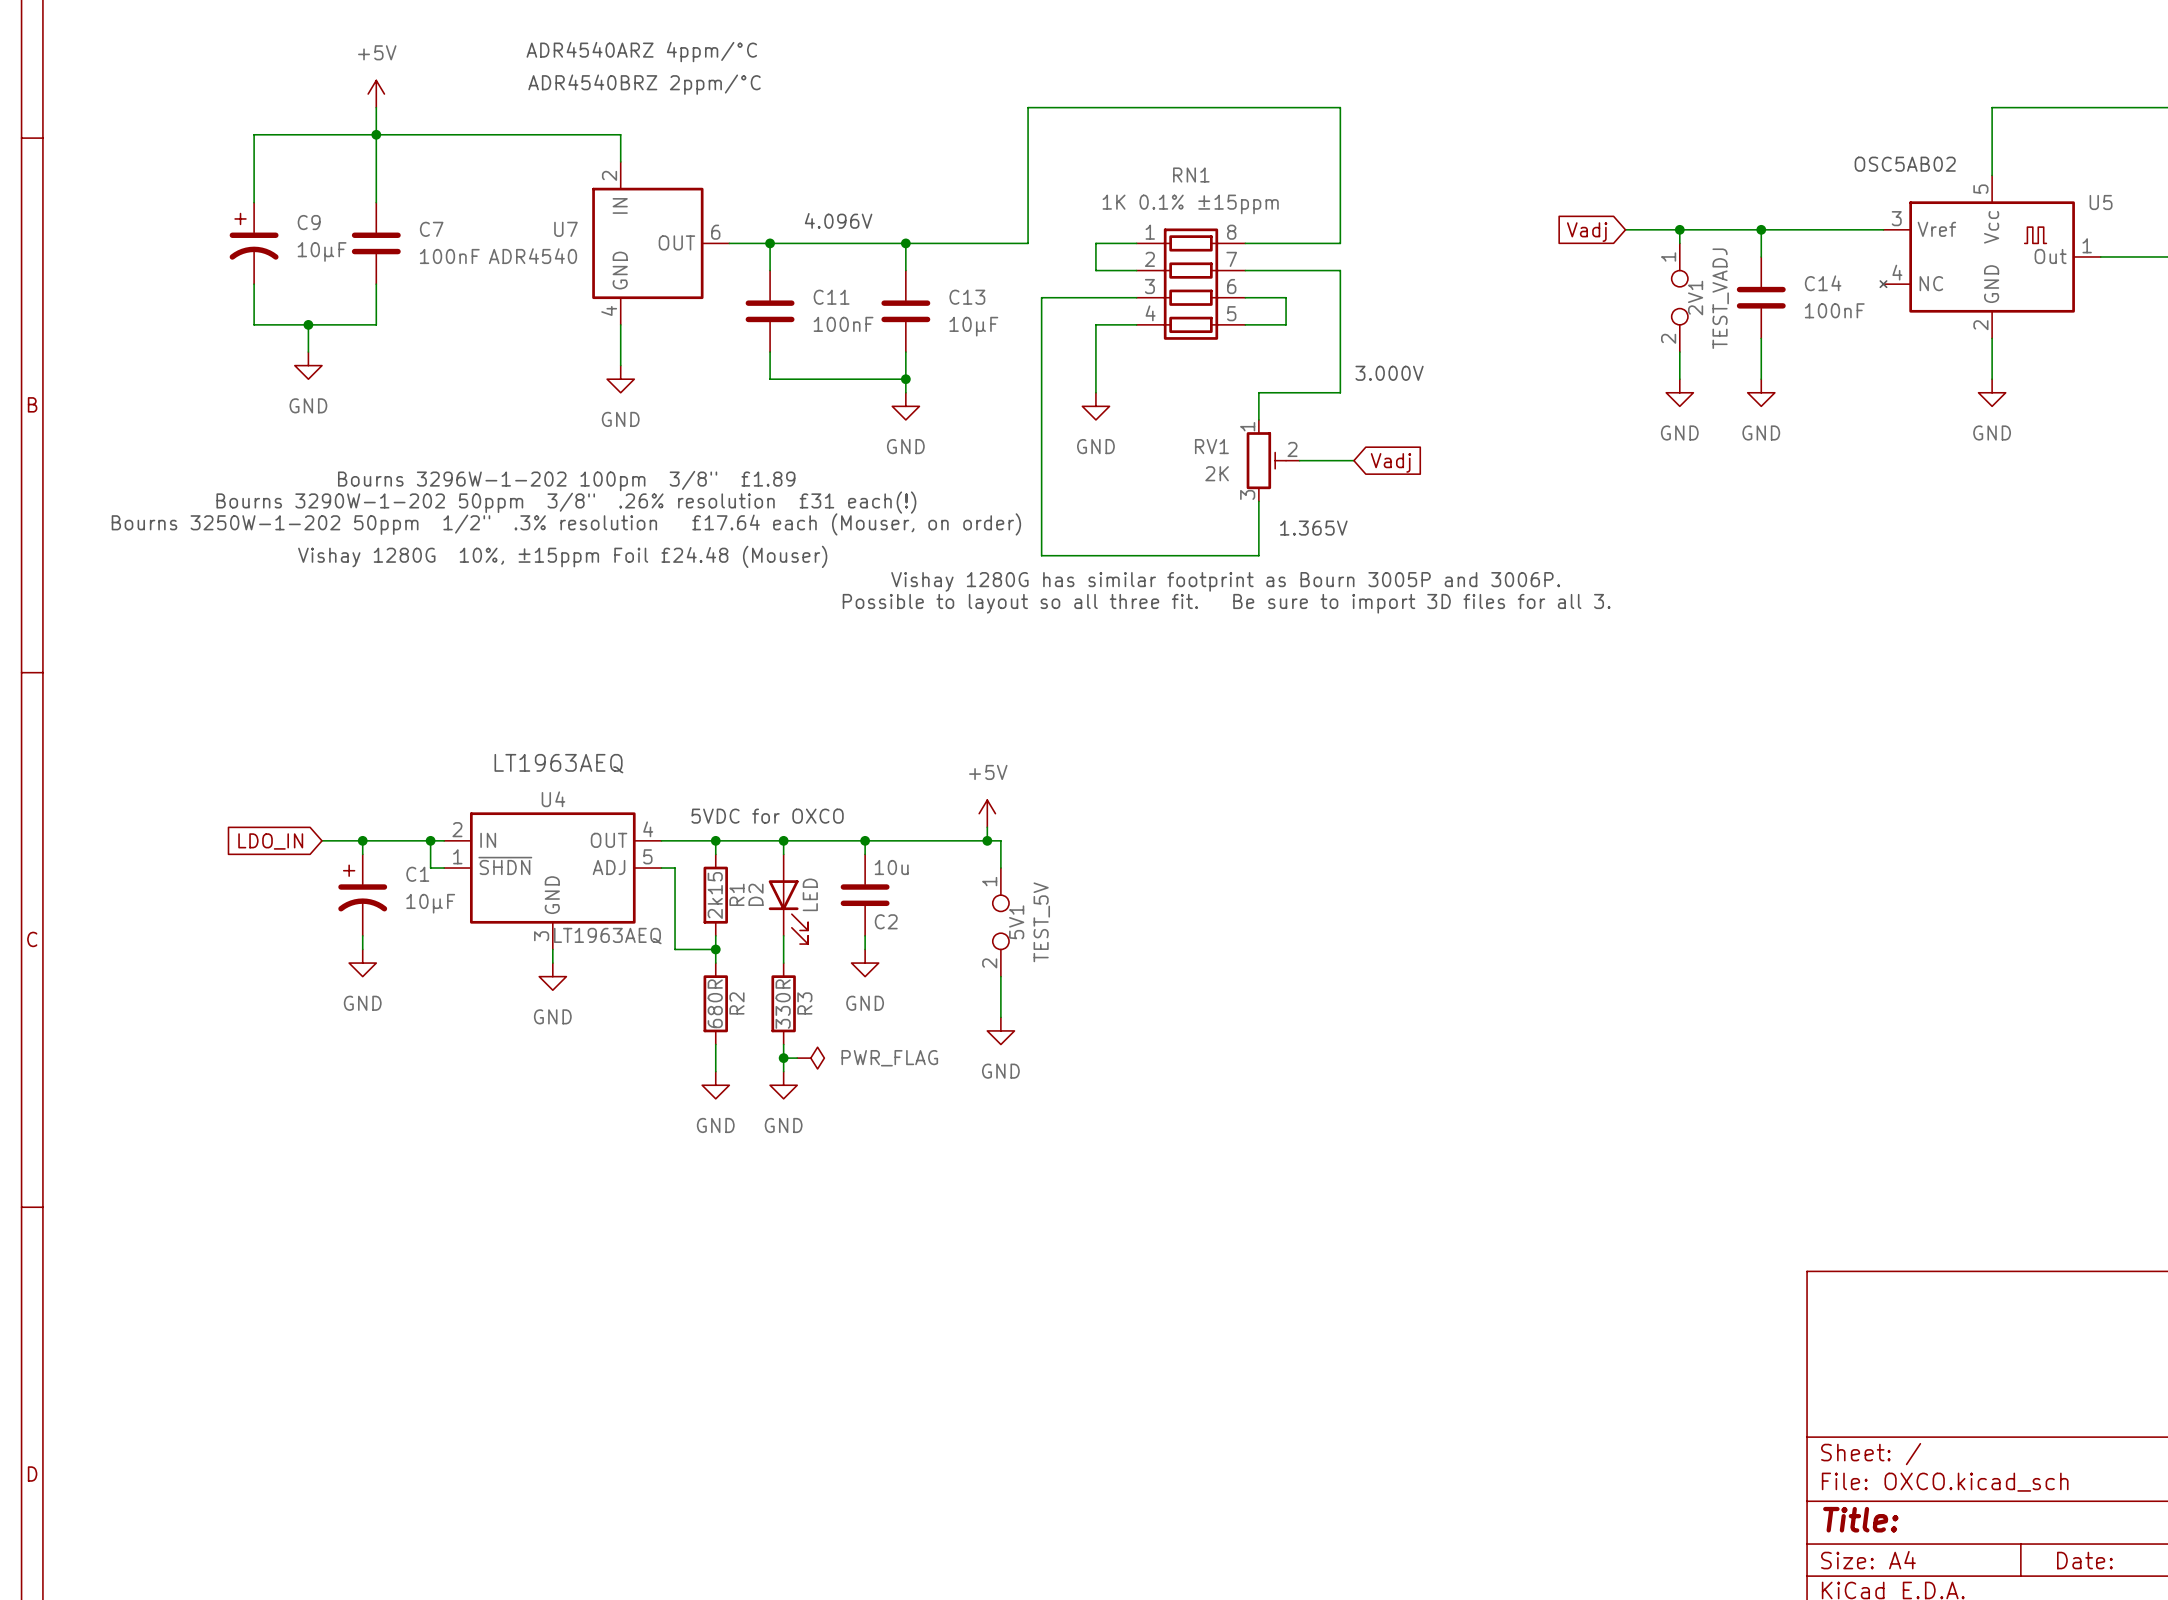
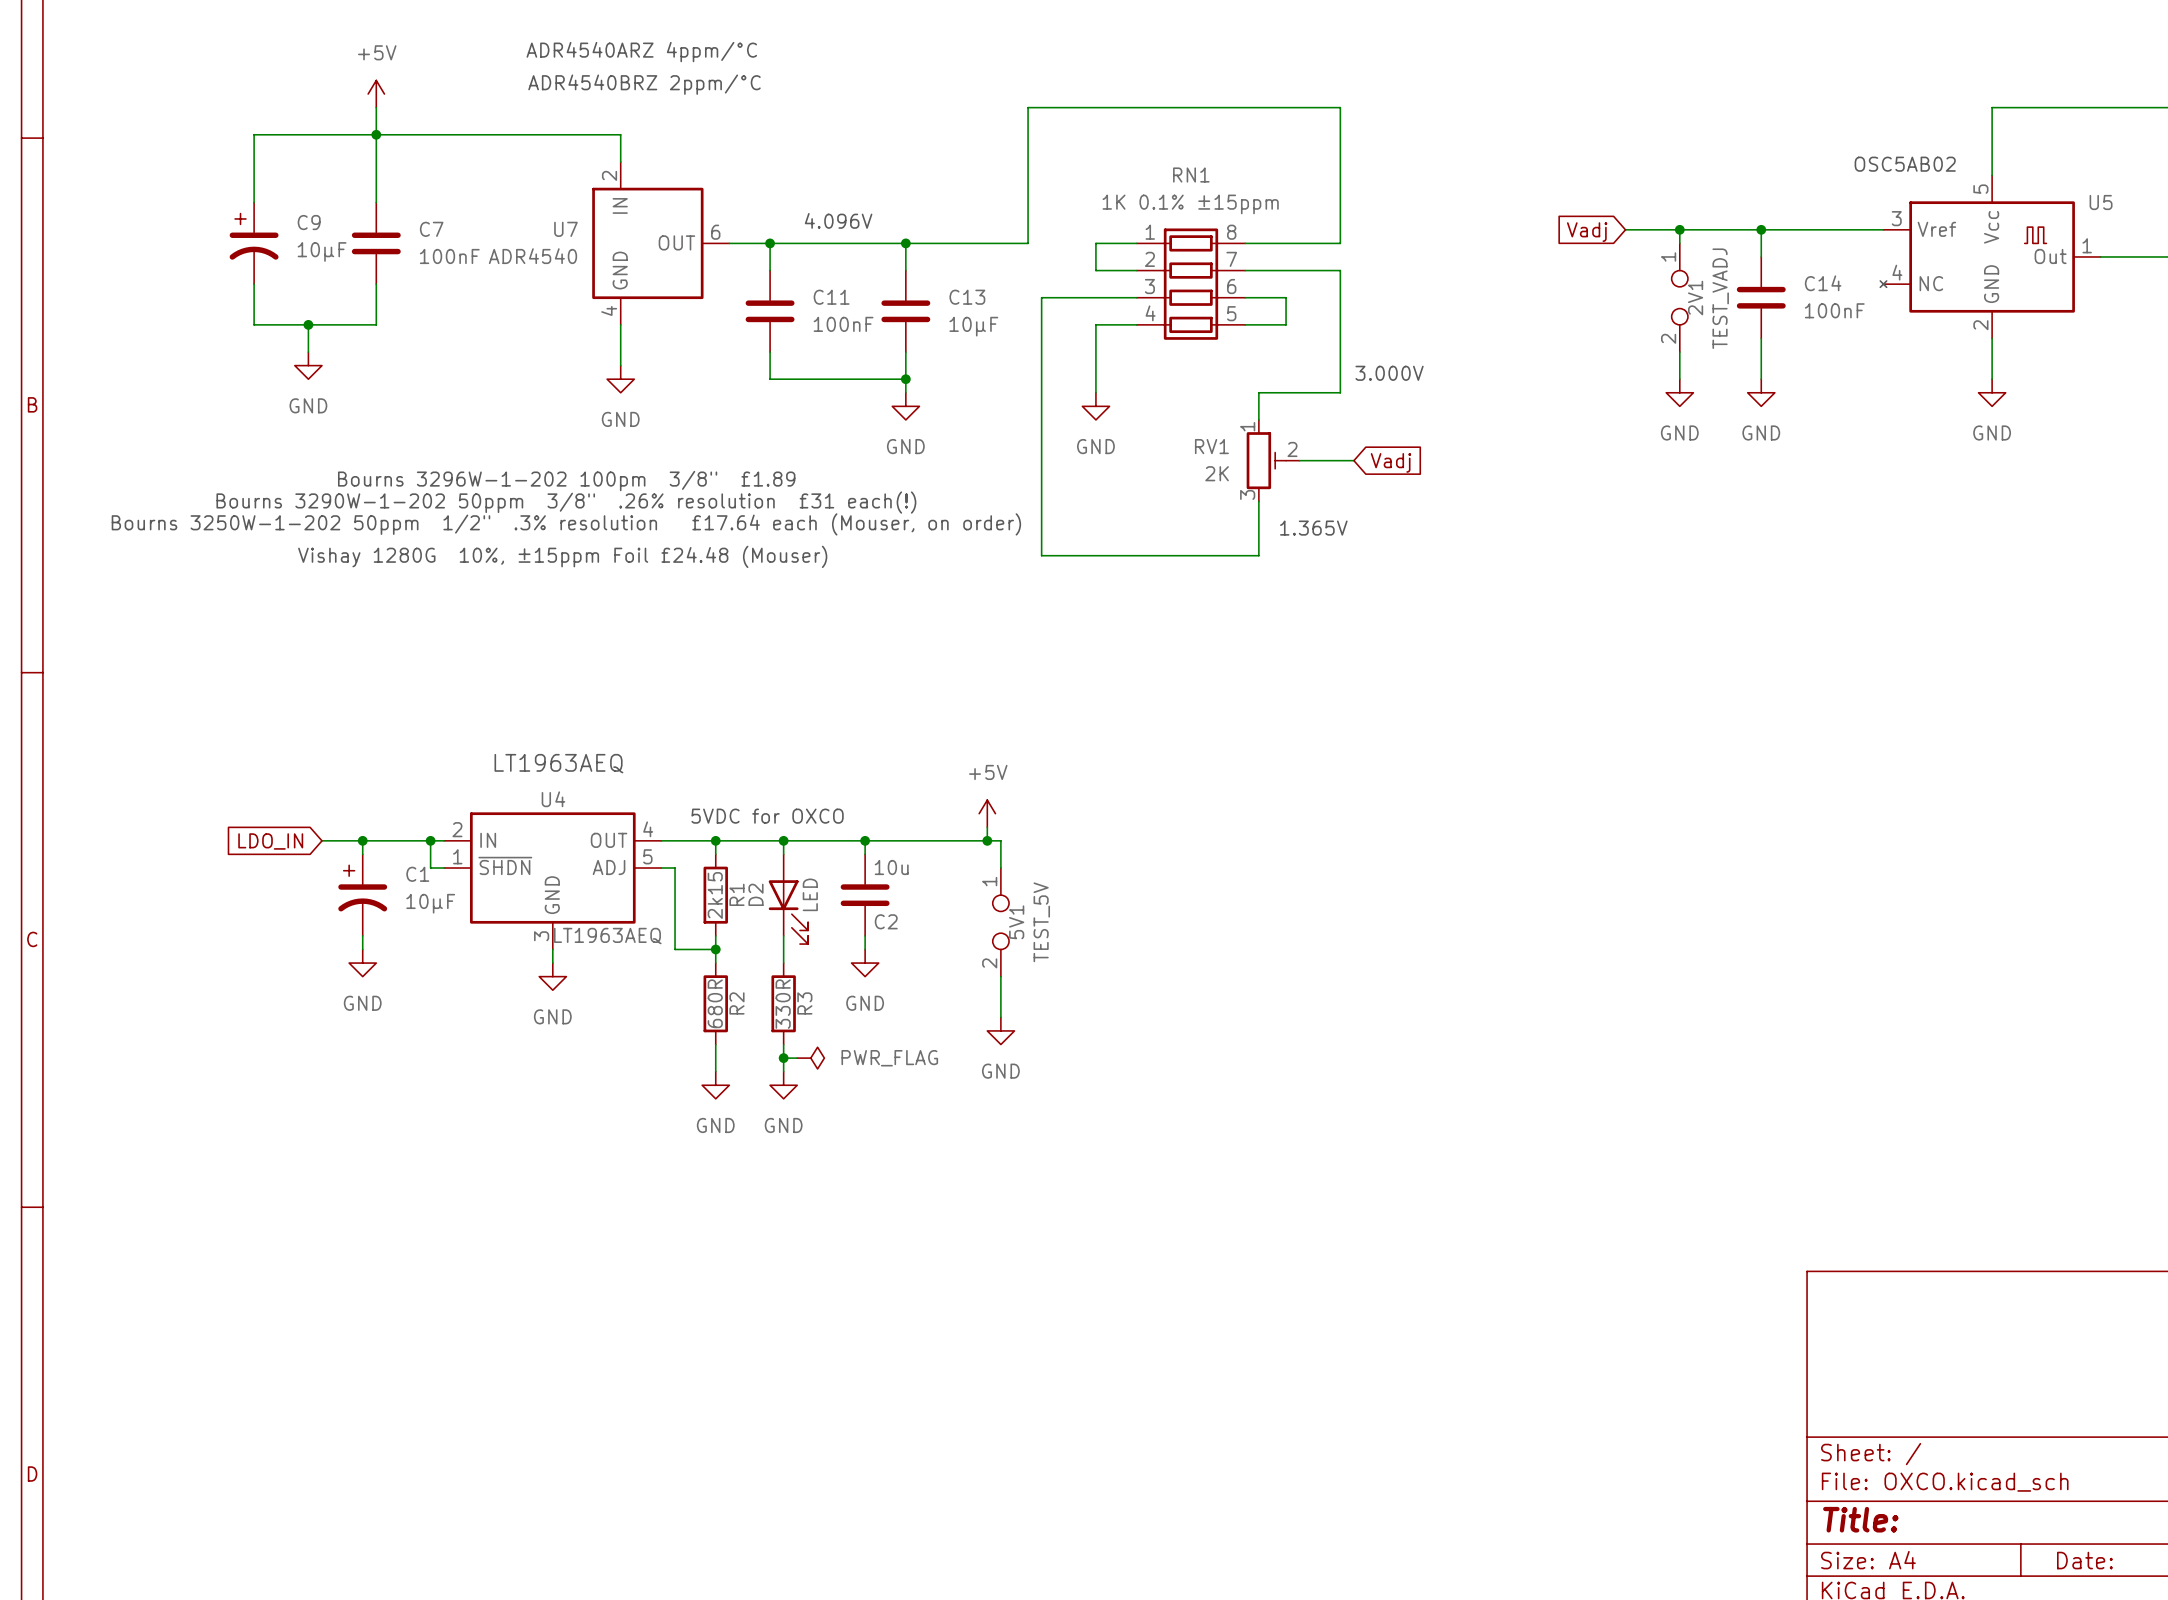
text: Vishay 1280G has similar footprint as Bourn 3005P and 3006P. (1225, 581) -> none
text: Possible to layout so all three fit. Be sure to import 3D files for all 3. (1226, 603) -> none

